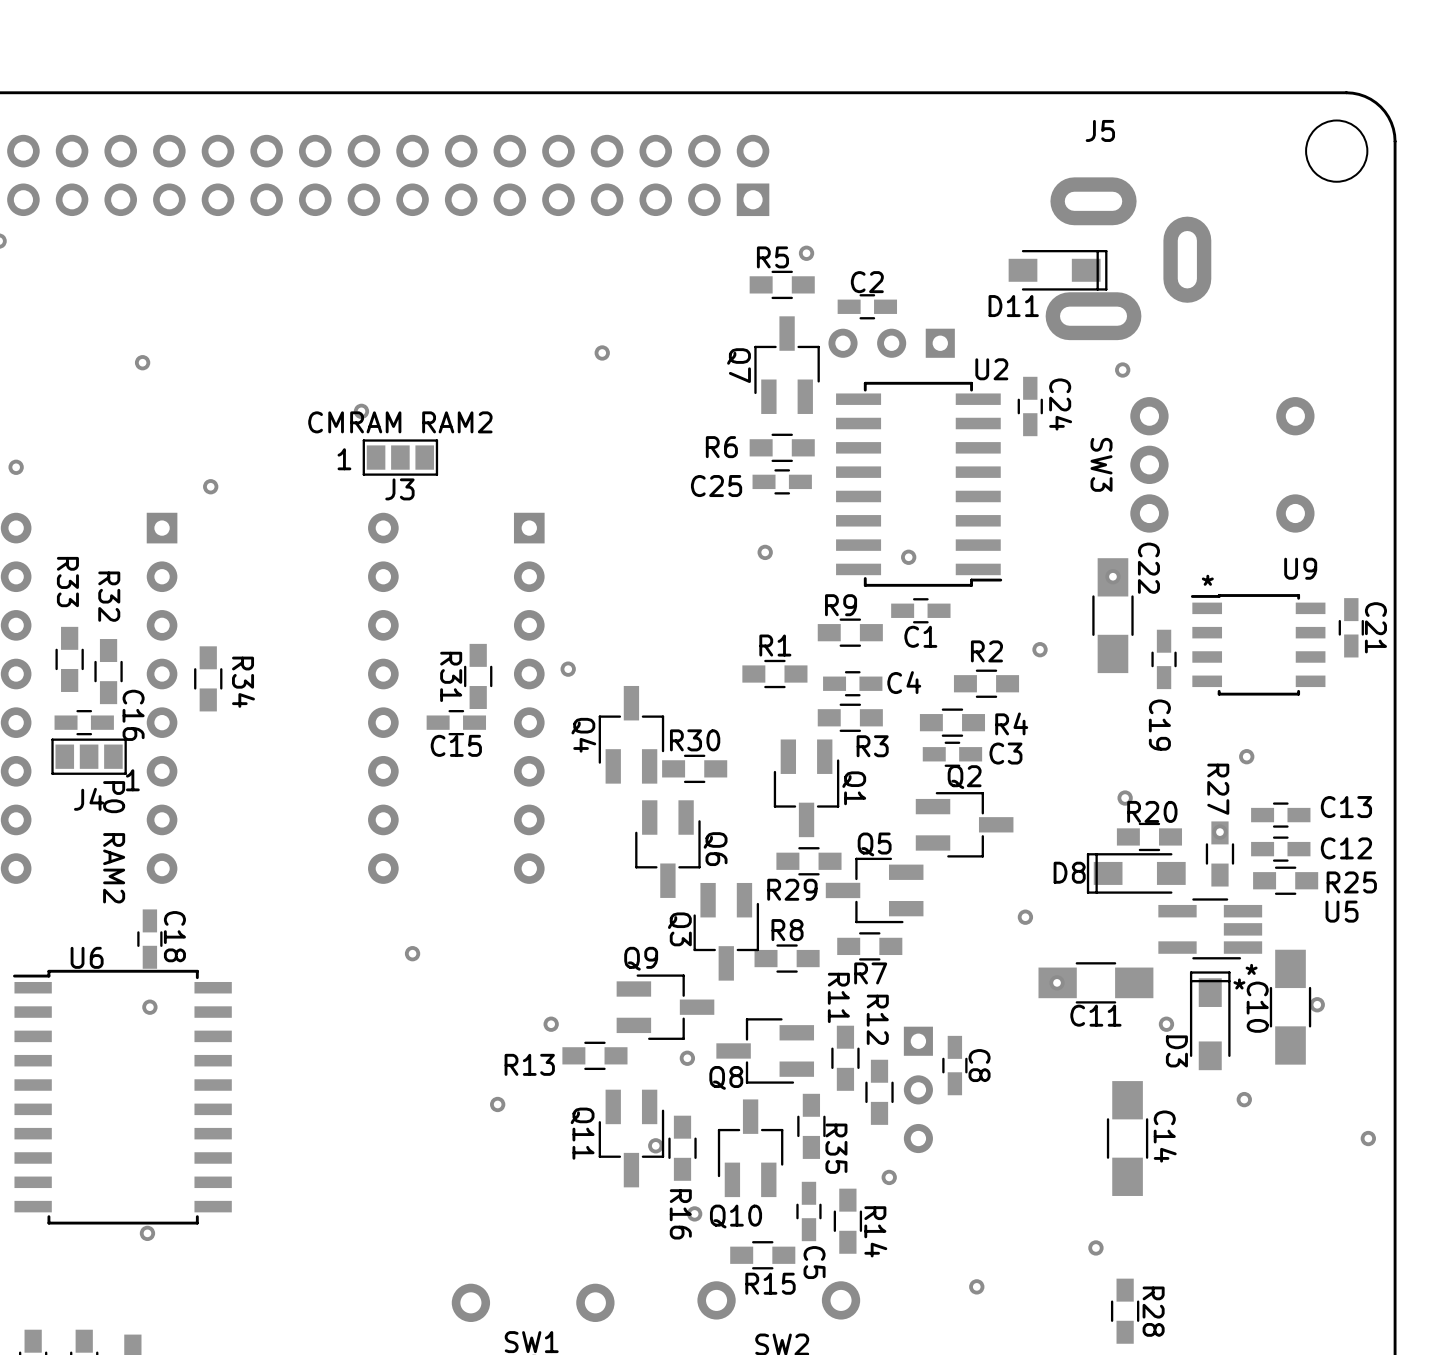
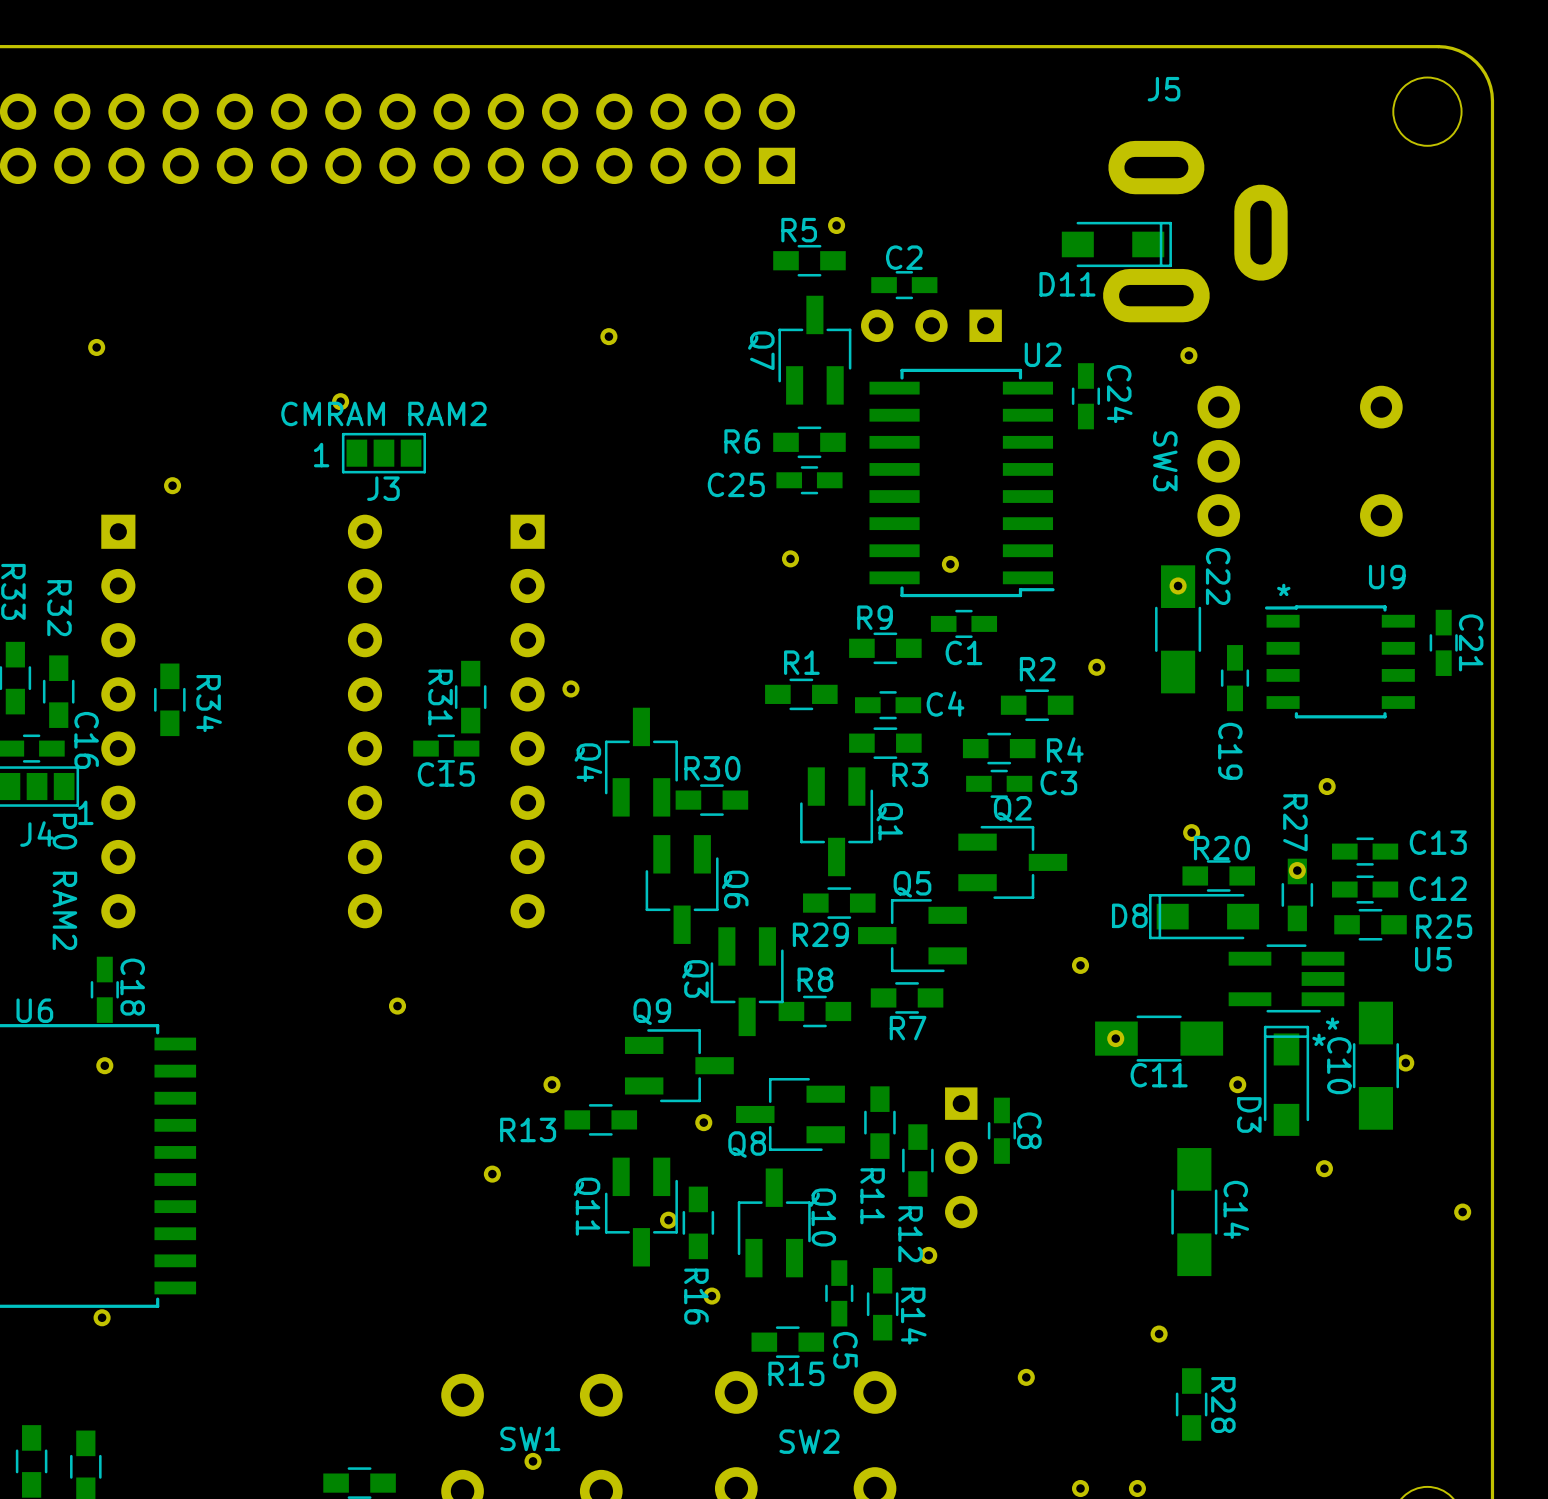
R11 name position: R11 (838, 997) -> R11 (872, 1196)
R12 name position: R12 (877, 1019) -> R12 (910, 1234)
R35: (811, 1126) -> none
Q10 name rotation: 0° (736, 1216) -> 90° clockwise (822, 1217)
Q10 name position: Q10 (736, 1216) -> Q10 (822, 1217)

